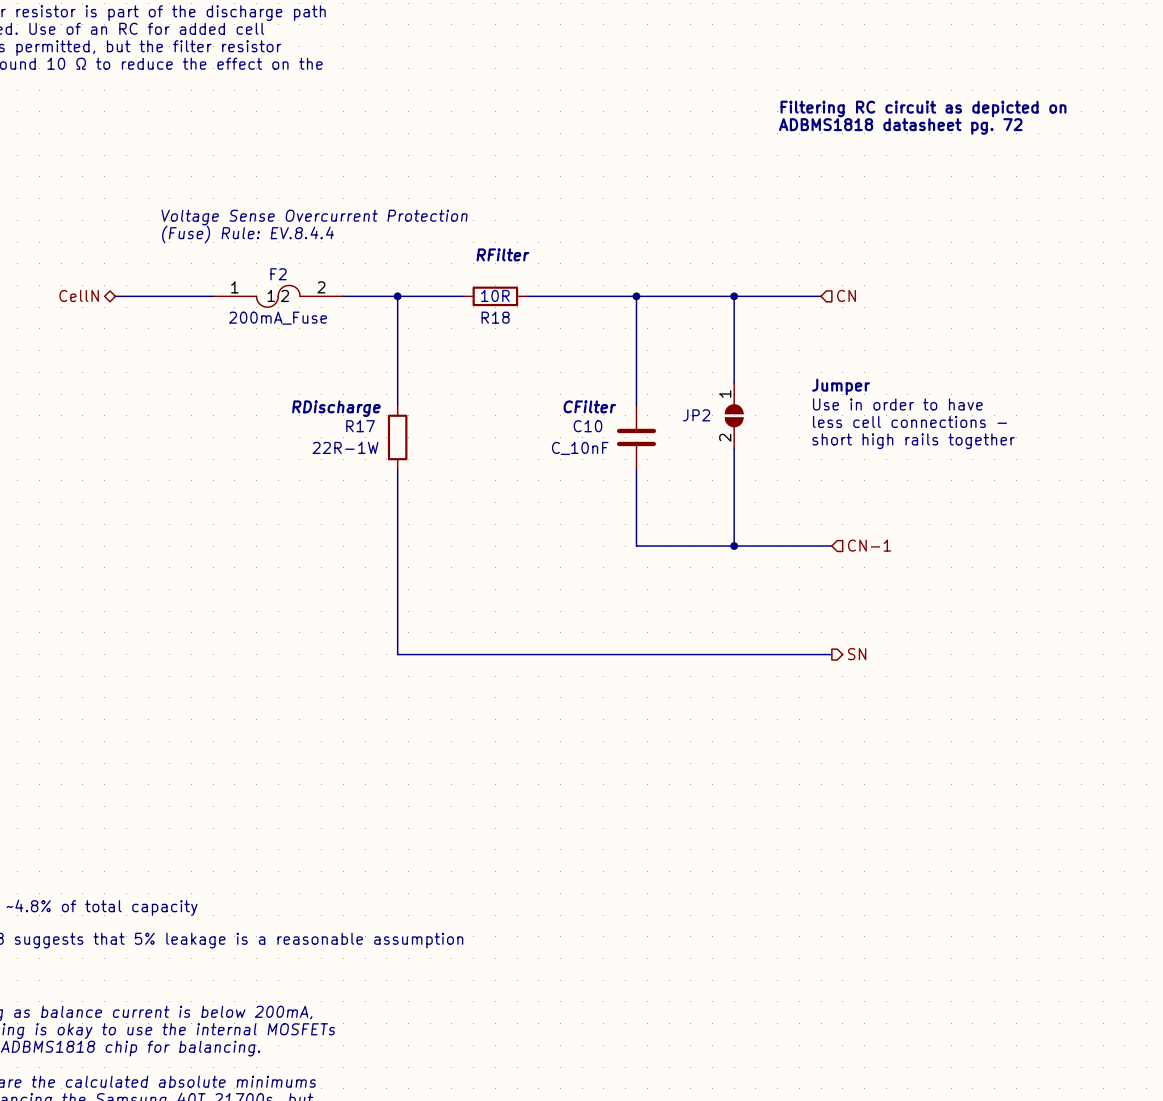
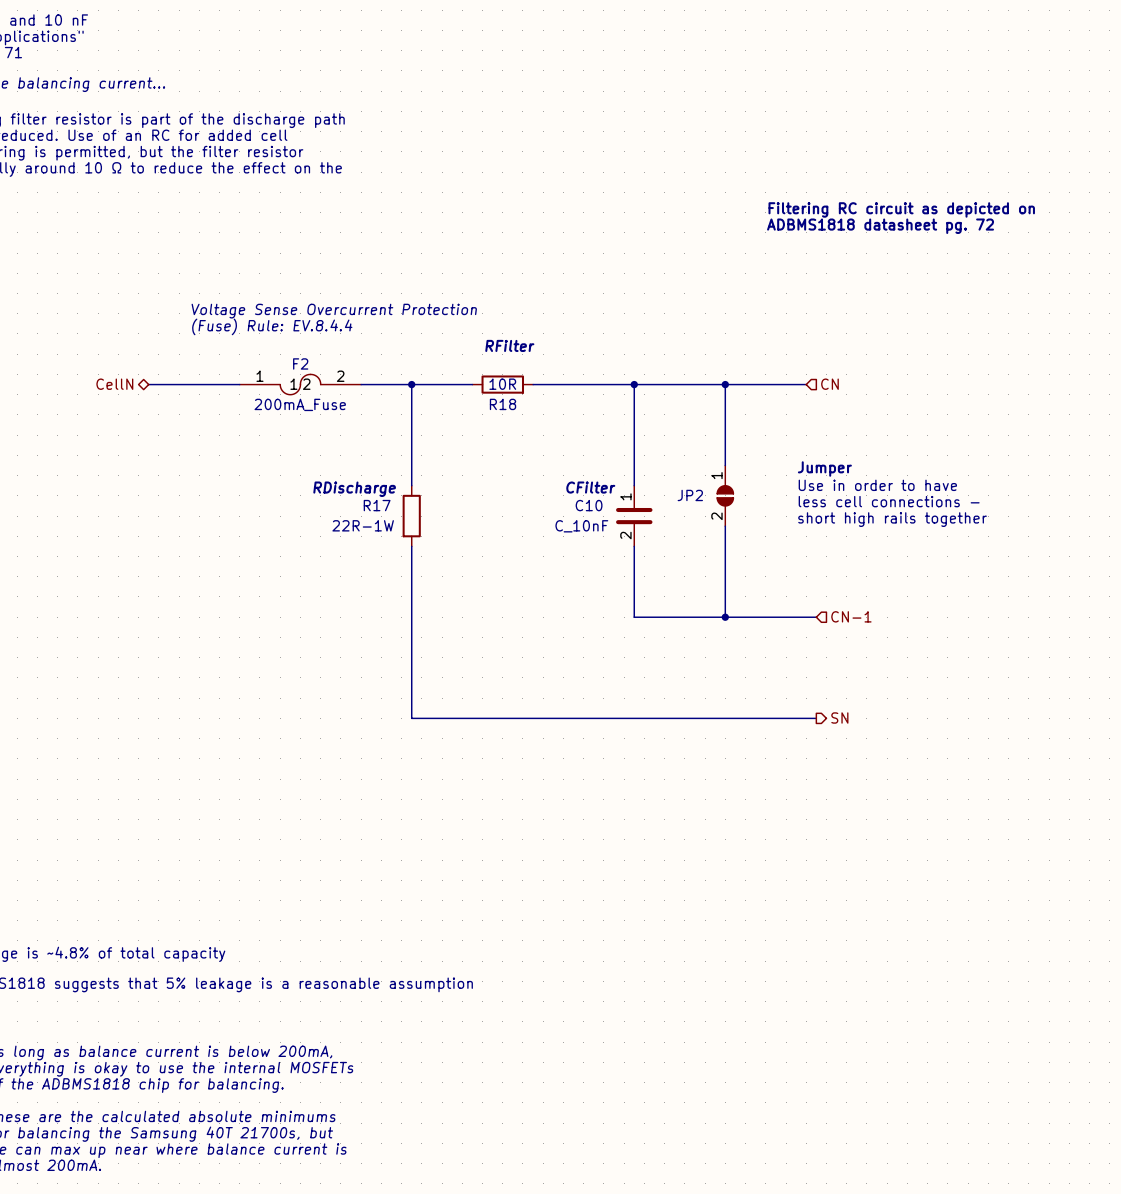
C10 pin number: none -> 1 (625, 496)
C10 pin number: none -> 2 (625, 535)

